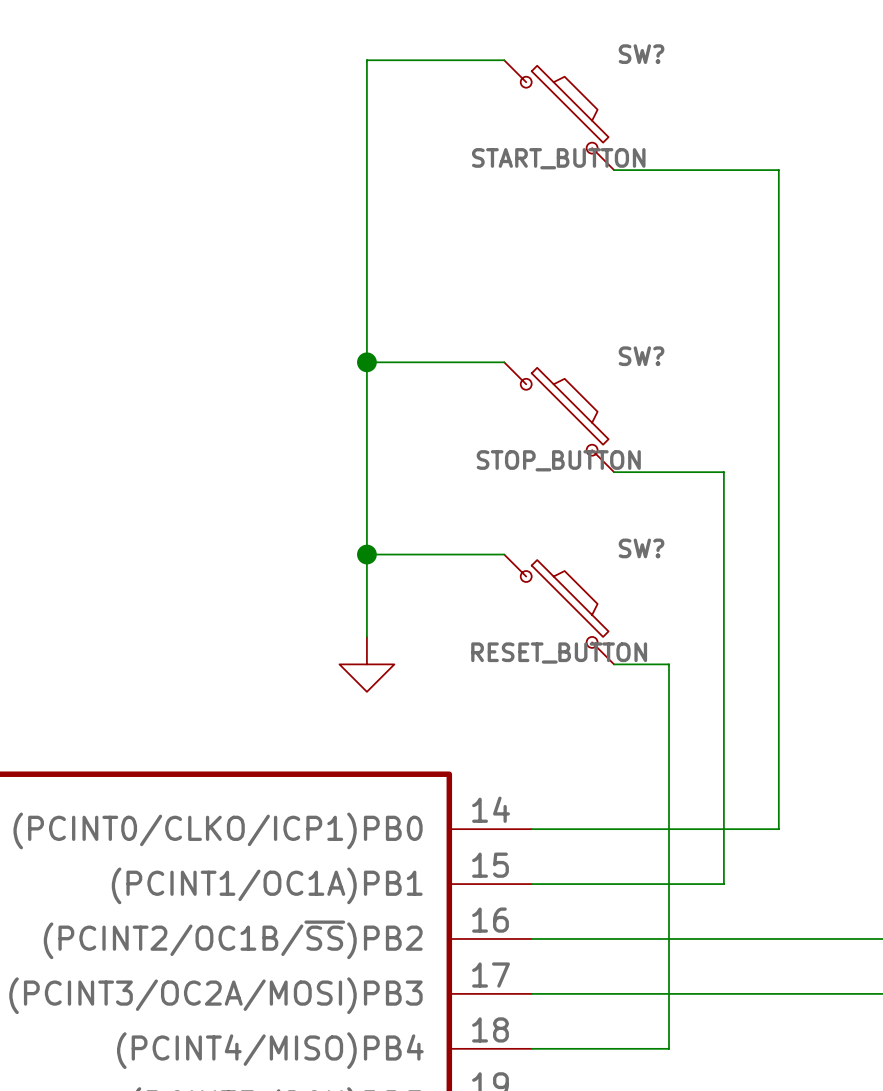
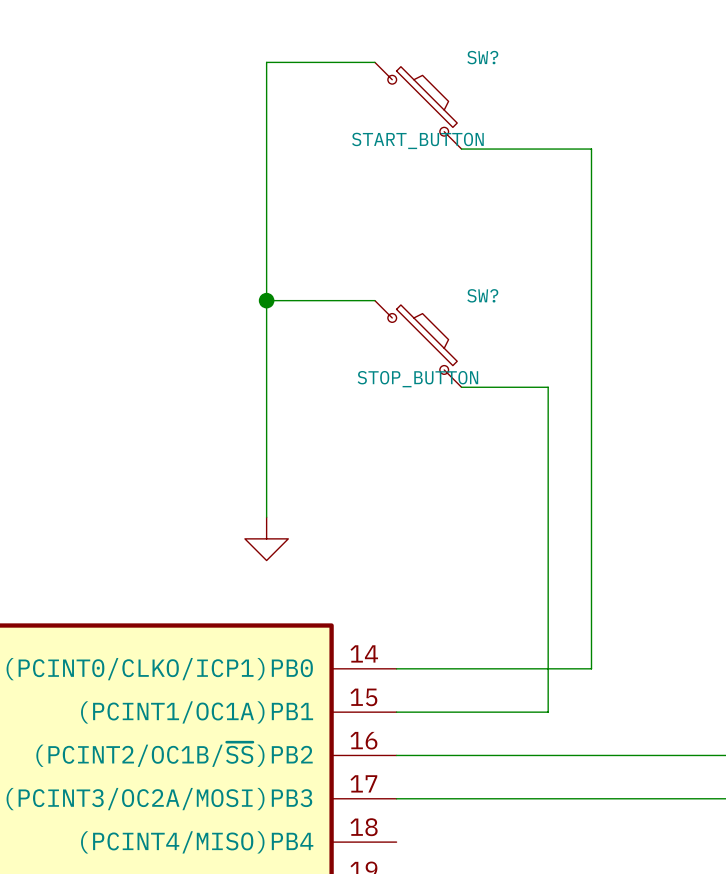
wire: (366, 554) (504, 554) -> none
junction: (366, 554) -> none
SW?: RESET_BUTTON (559, 609) -> none
wire: (614, 664) (669, 664) (669, 1048) (531, 1048) -> none

